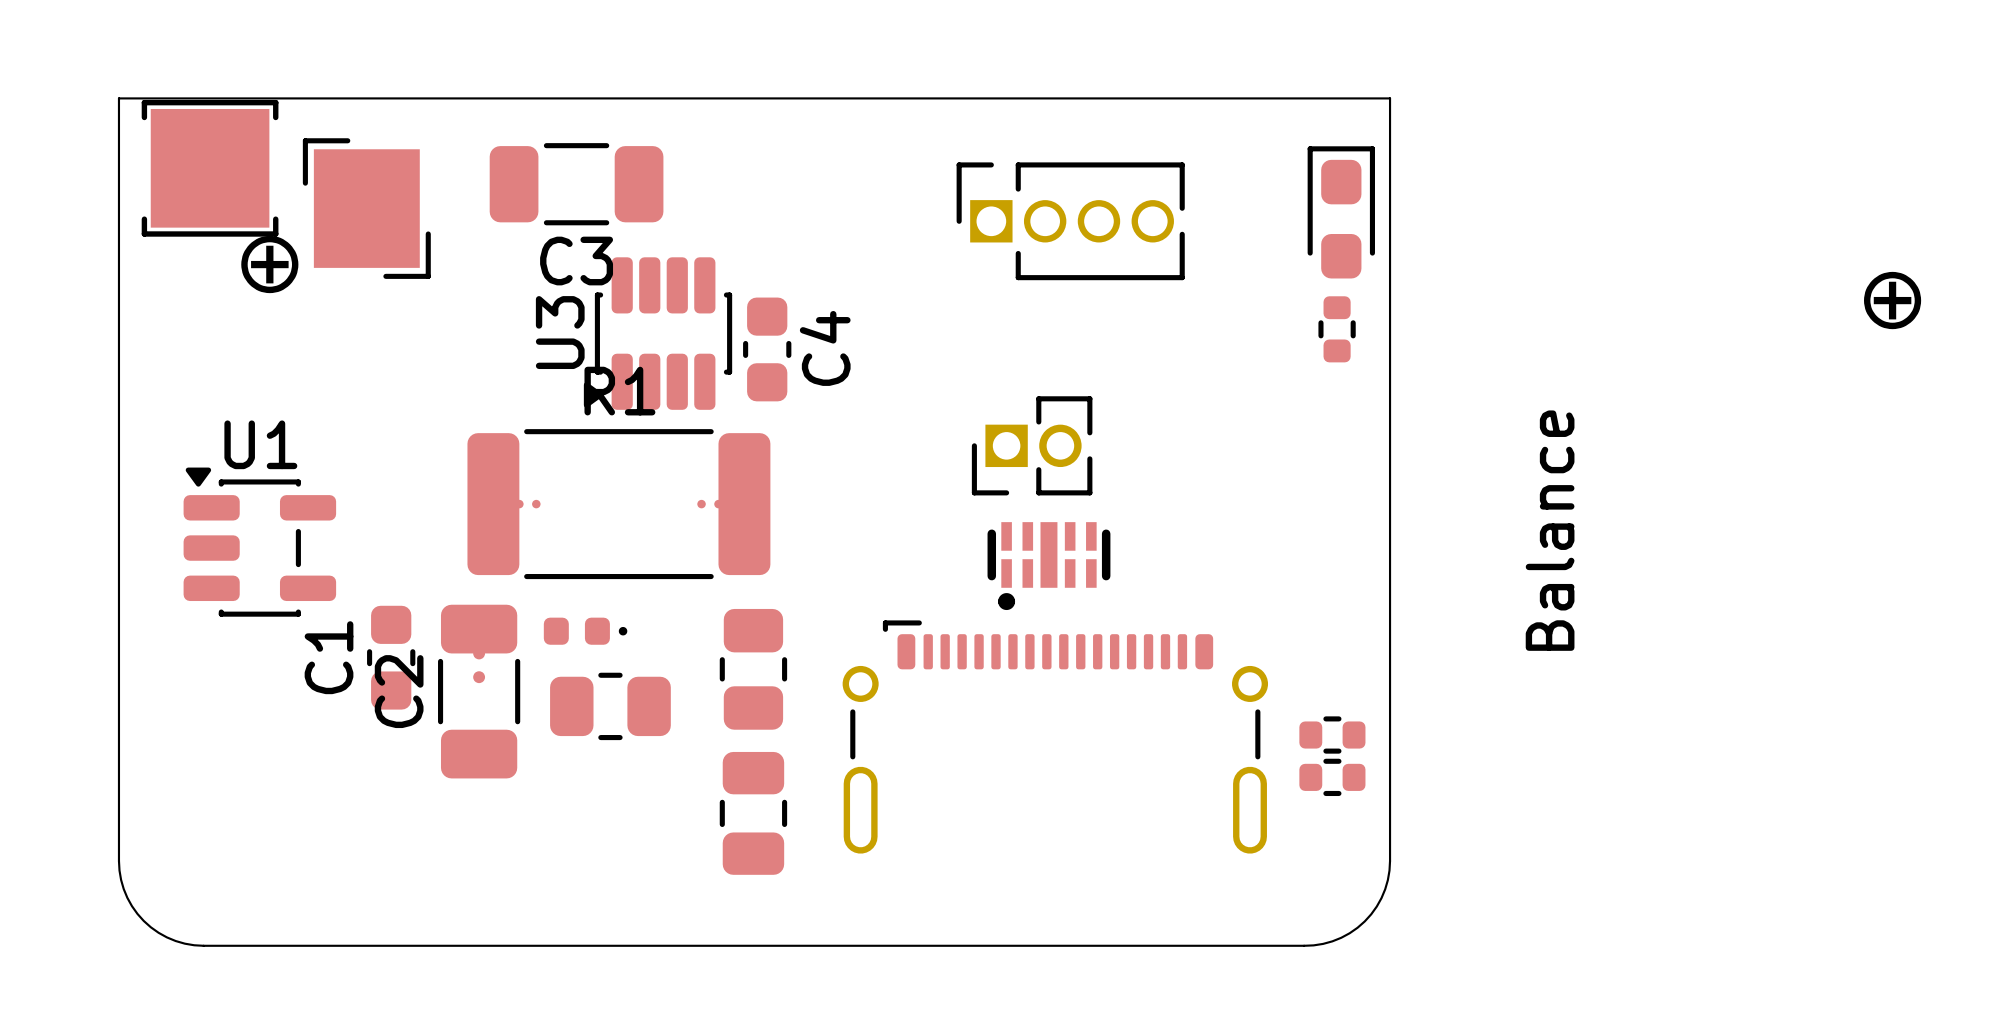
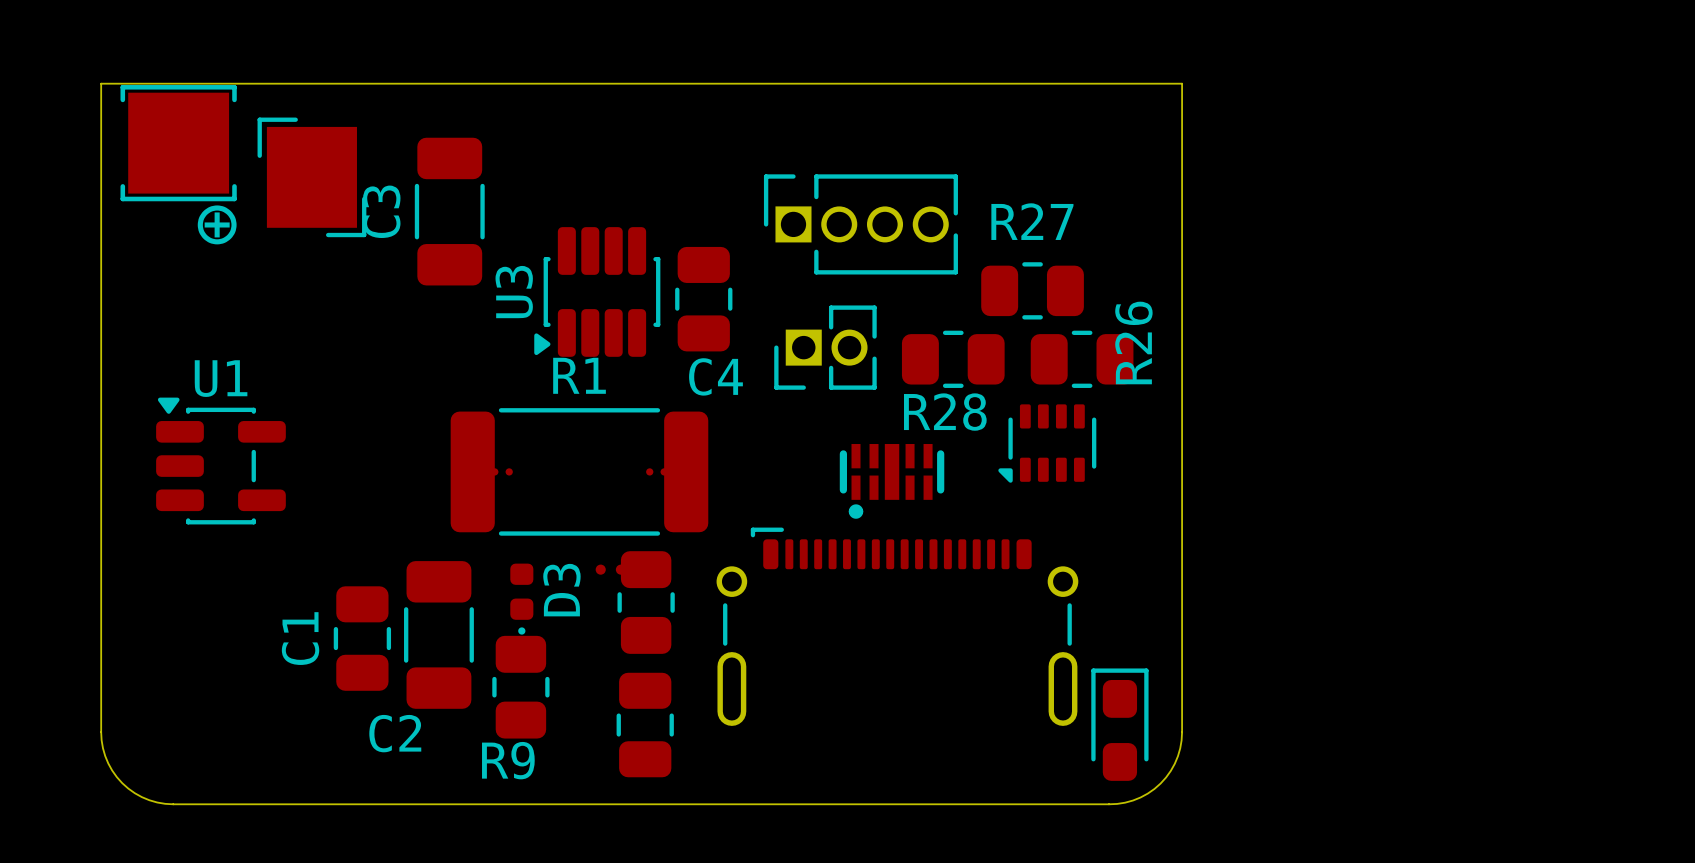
C3 rotation: 0° (576, 184) -> 90° clockwise (449, 211)
part position: (1341, 212) -> (1119, 724)
part position: (1070, 221) -> (860, 224)
C4 footprint: [743, 297, 792, 402] -> [675, 246, 733, 352]
text: ⊕ (1892, 300) -> none
part: (1337, 329) -> none
U3 position: (658, 333) -> (597, 291)
R27: none -> (1032, 290)
C4 name position: C4 (825, 348) -> C4 (715, 376)
R28: none -> (953, 359)
R26: none -> (1082, 359)
part position: (1032, 445) -> (825, 347)
part: (527, 504) -> none
R1 position: (618, 504) -> (579, 471)
part: (710, 504) -> none
part: none -> (1047, 443)
text: Balance (1550, 530) -> none
part: none -> (502, 471)
part: none -> (656, 471)
C1 footprint: [367, 605, 416, 710] -> [333, 586, 392, 691]
part: (585, 631) -> none
part rotation: 0° (479, 665) -> 90° clockwise (610, 569)
part position: (479, 665) -> (610, 569)
part position: (753, 669) -> (646, 602)
C2 name rotation: 0° (399, 691) -> 90° clockwise (395, 733)
C2 name position: C2 (399, 691) -> C2 (395, 733)
C2 position: (479, 691) -> (438, 634)
D3: none -> (521, 599)
part: (610, 706) -> none
part: (1332, 735) -> none
part: (1332, 777) -> none
R9: none -> (520, 687)
part position: (753, 813) -> (645, 725)

